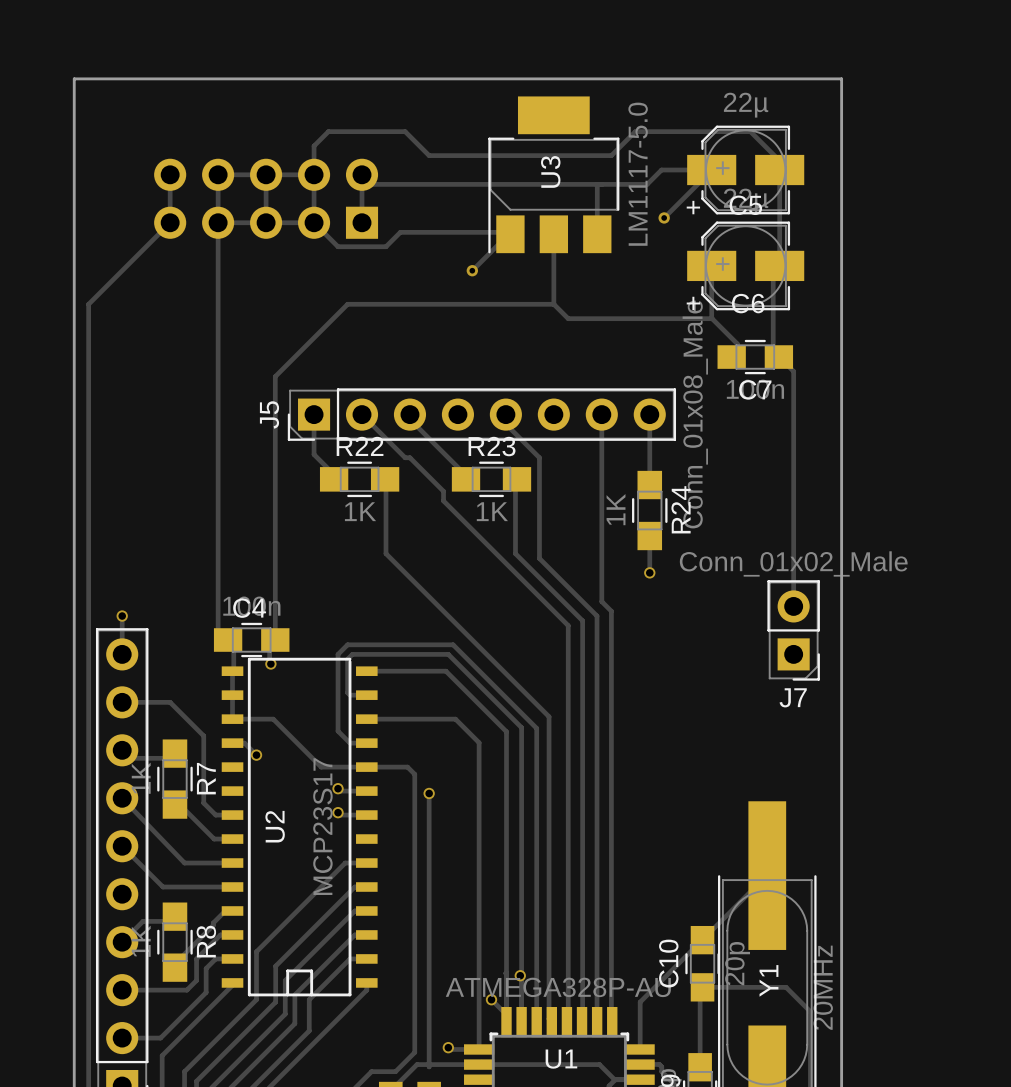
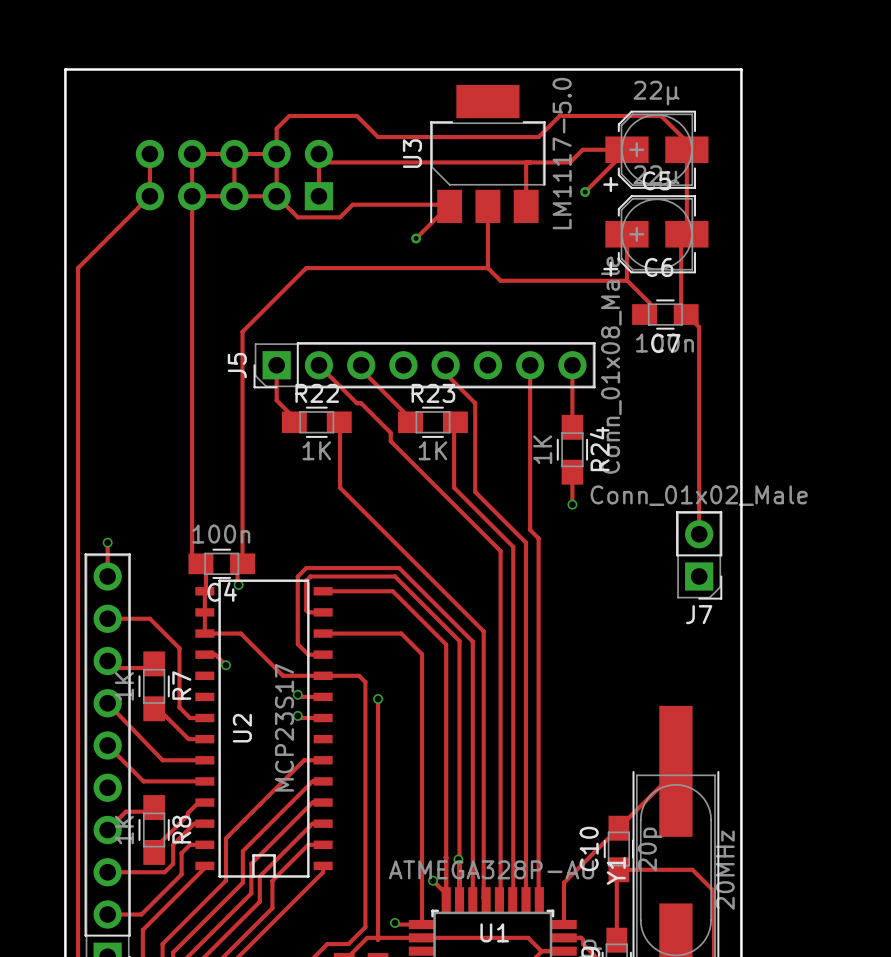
U3 name position: U3 (550, 171) -> U3 (412, 153)
C4 name position: C4 (249, 608) -> C4 (222, 591)
Y1 name position: Y1 (768, 980) -> Y1 (616, 870)

